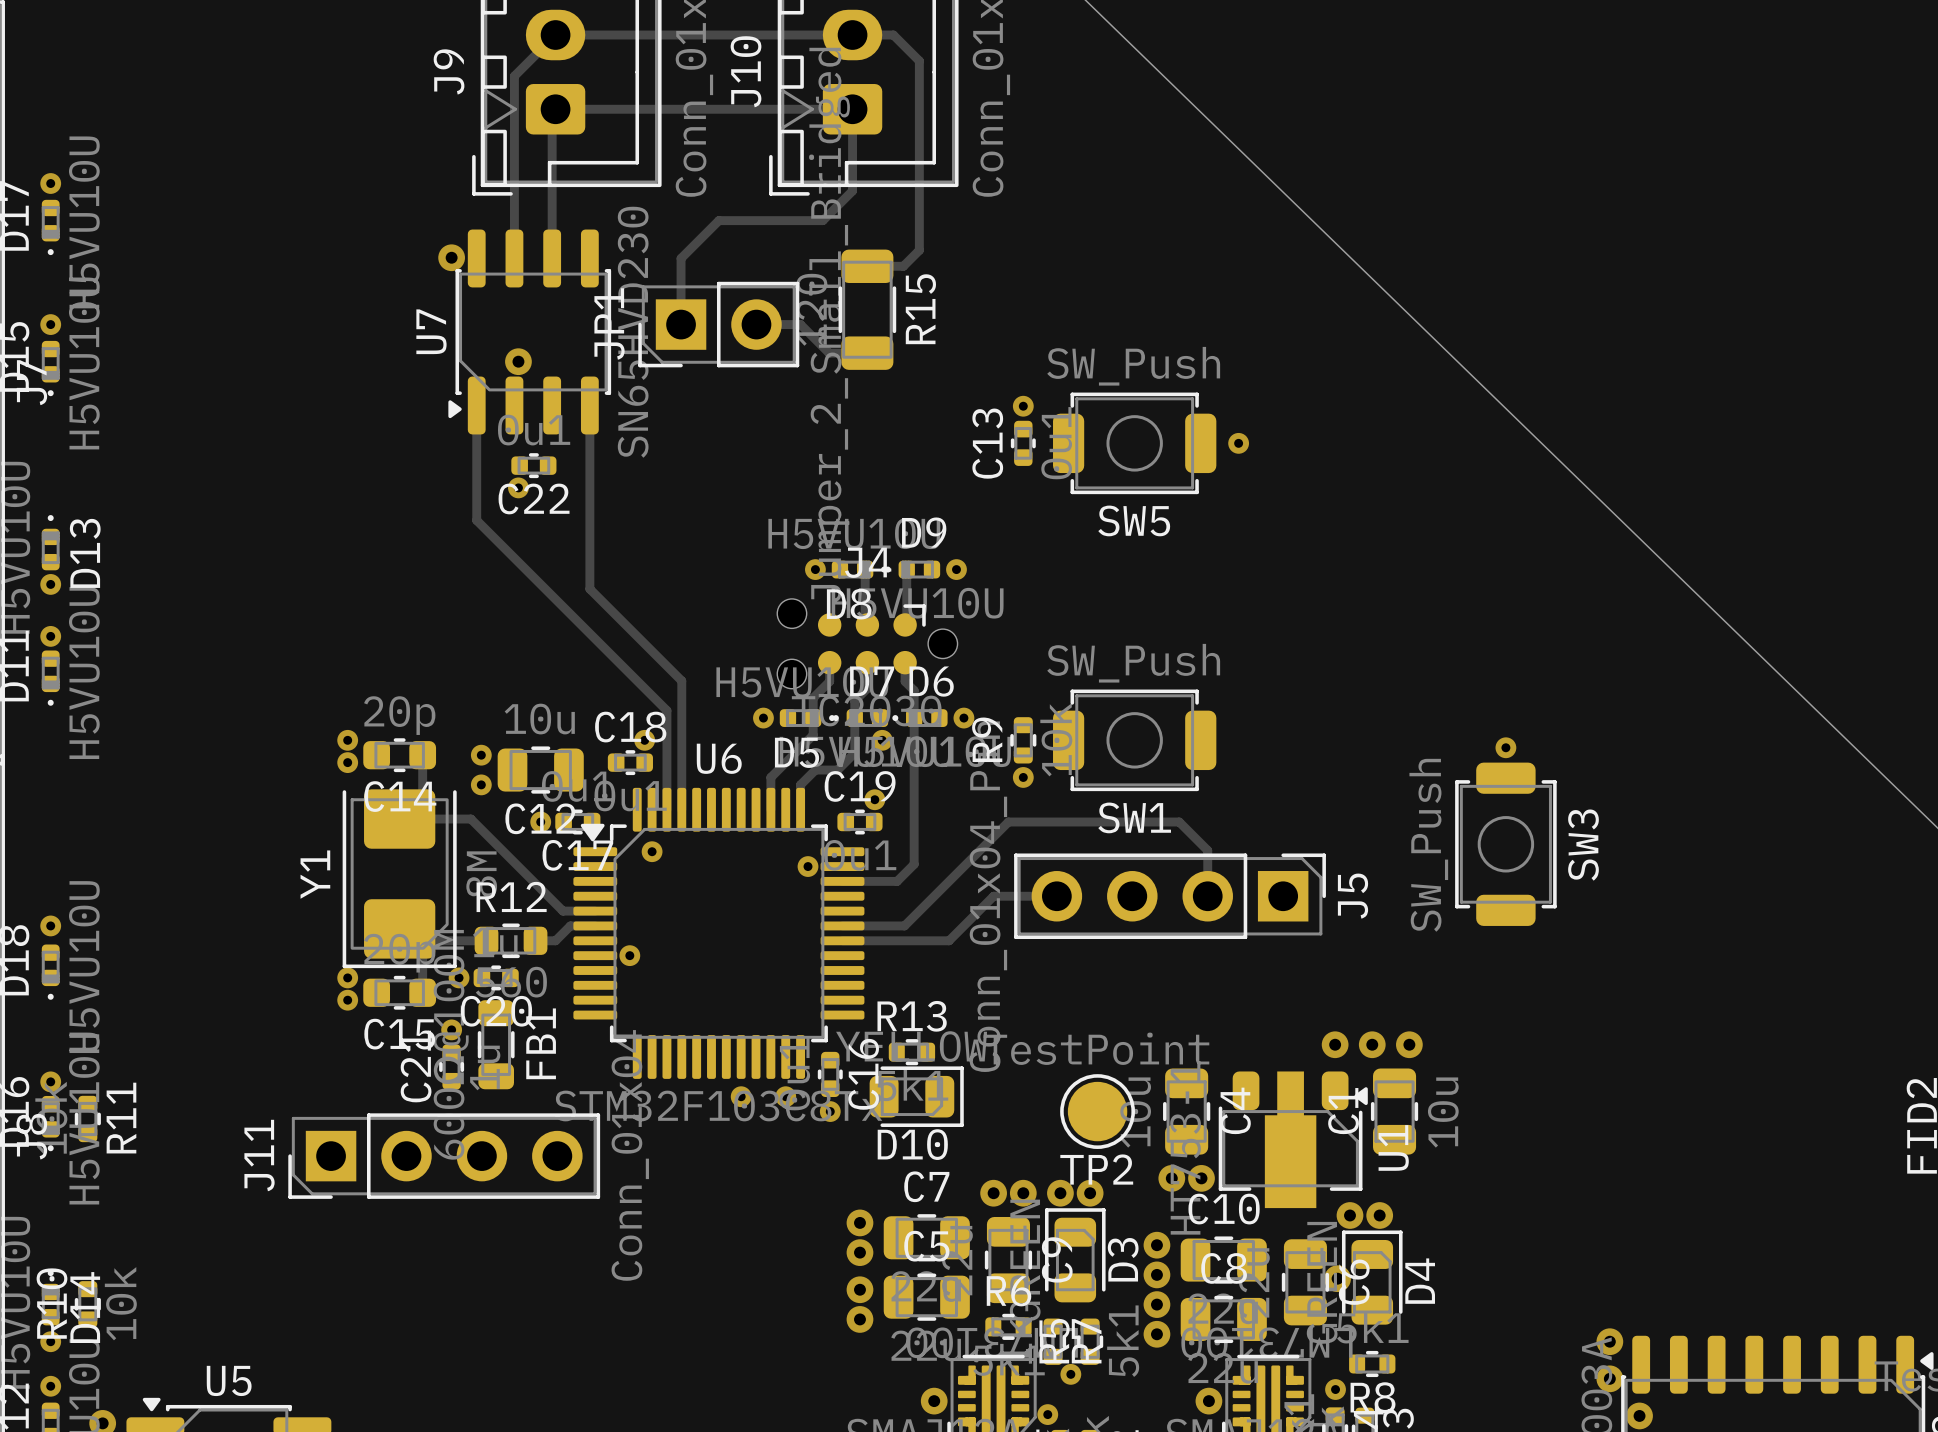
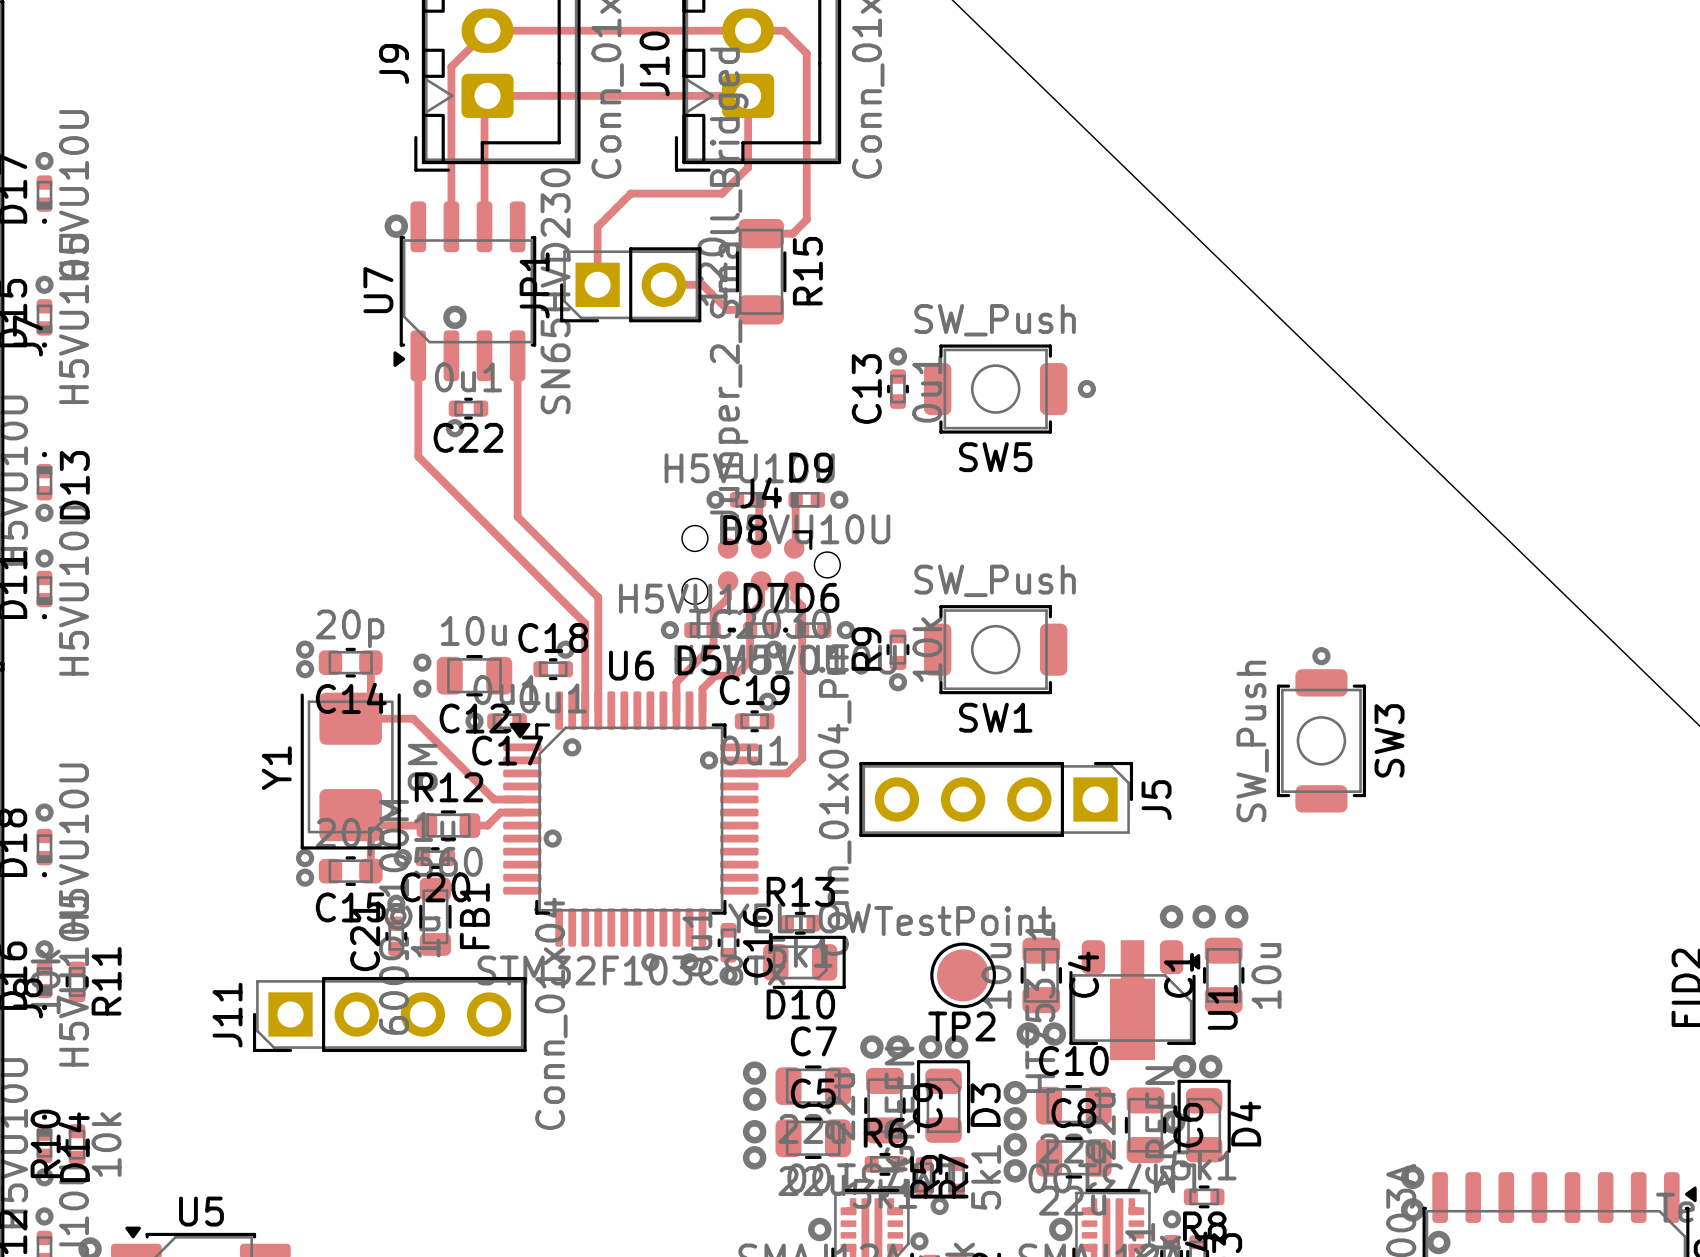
track: (1056, 896) (993, 896) (949, 940) (842, 940) -> none
J5 position: (1170, 896) -> (996, 799)
track: (1207, 896) (1207, 850) (1179, 822) (1008, 822) (904, 925) (842, 925) -> none

